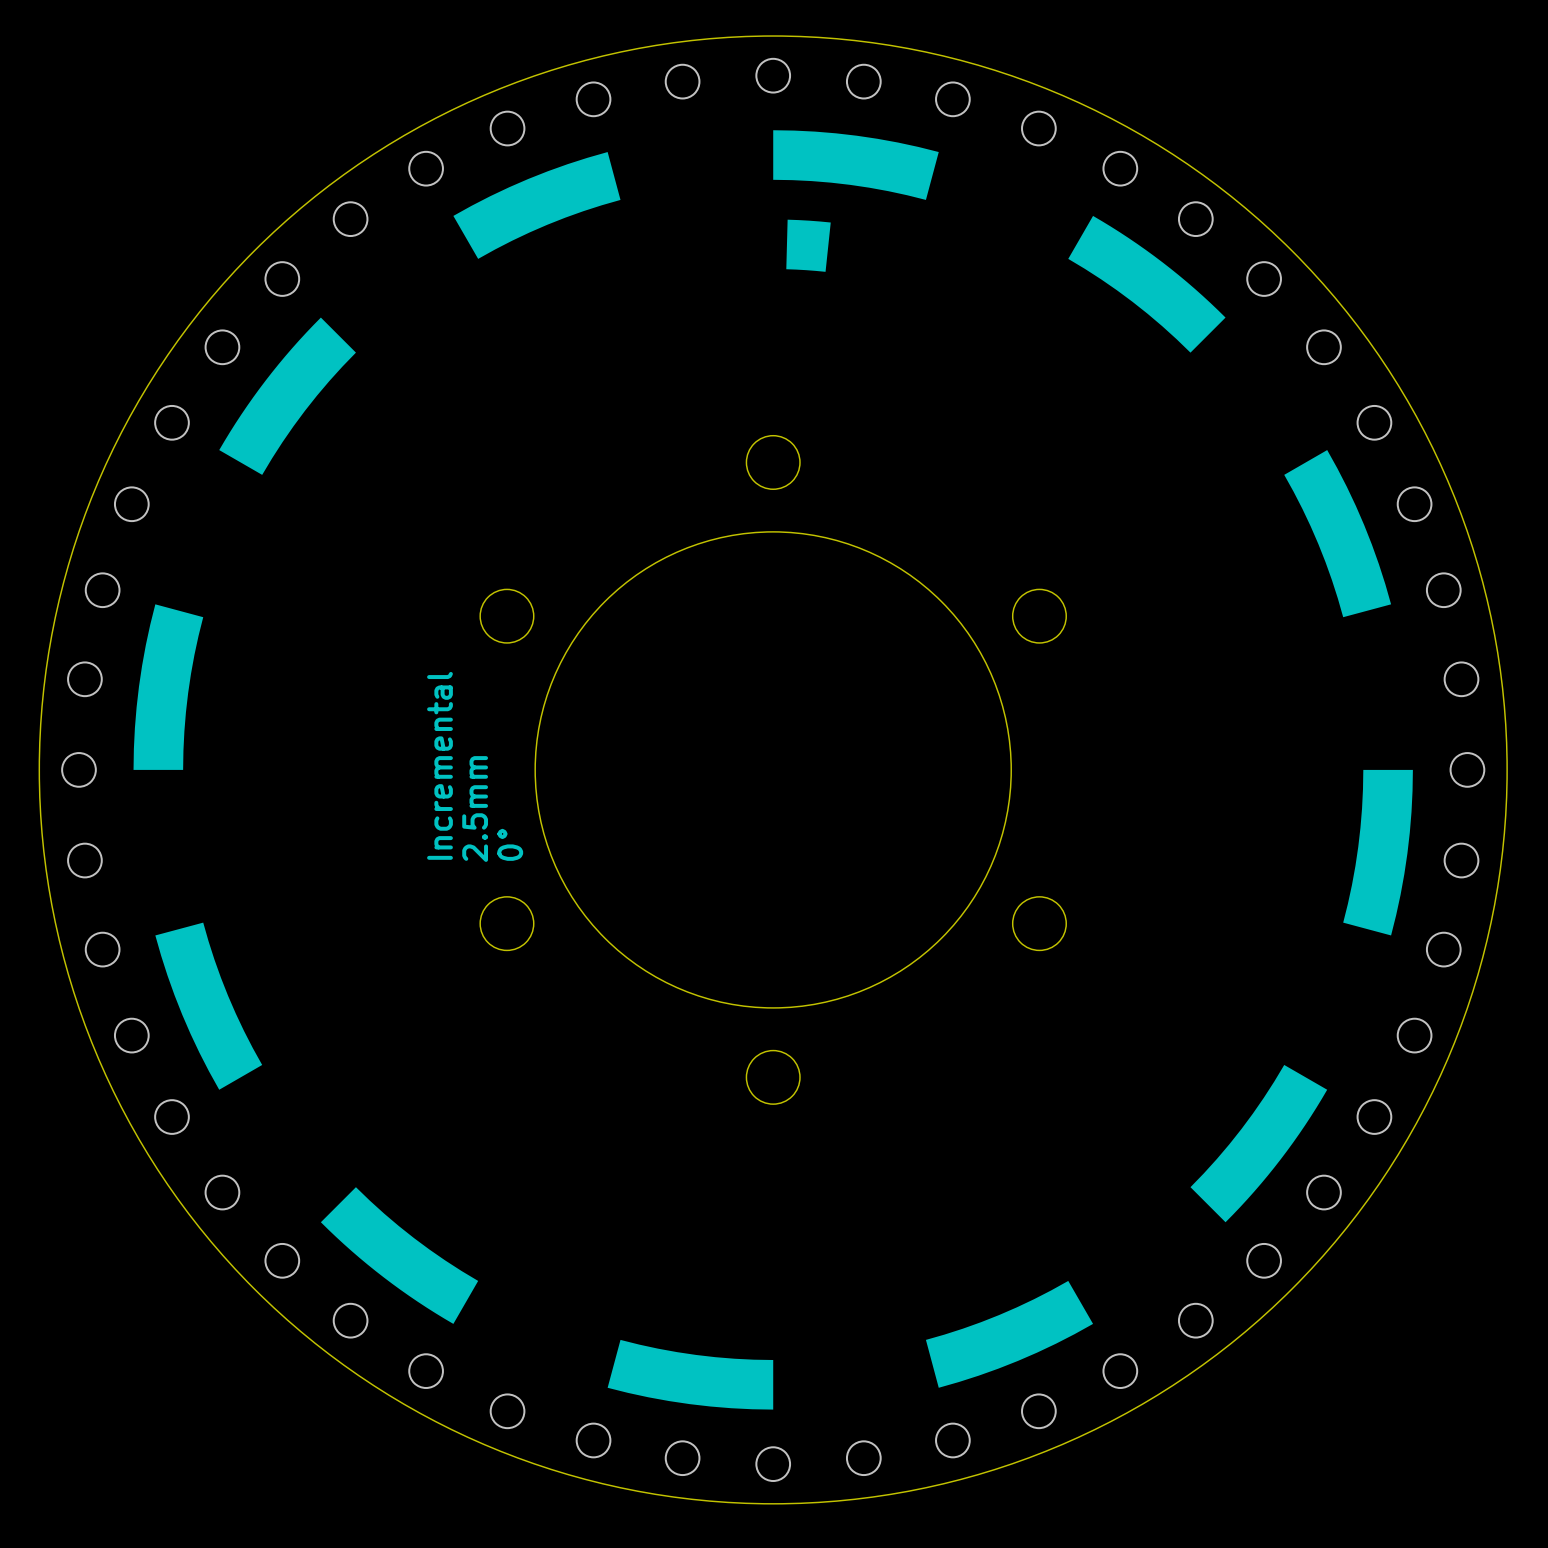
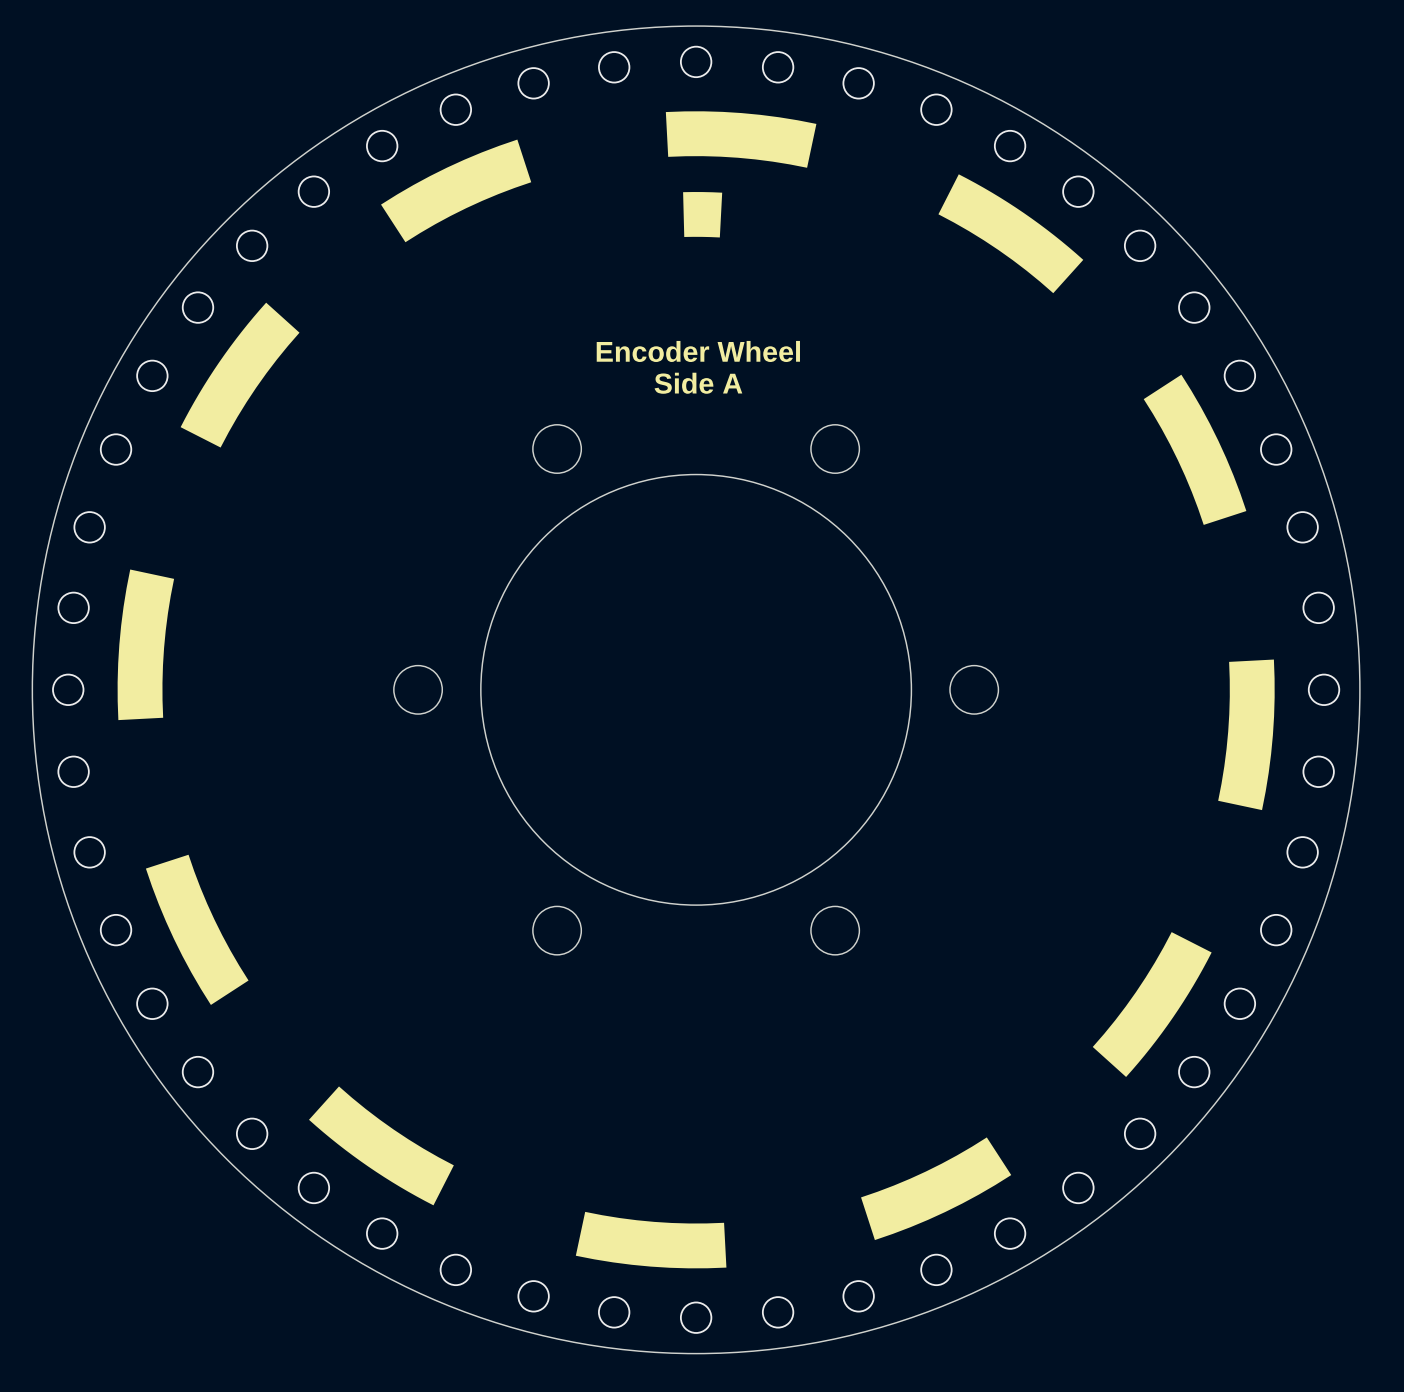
drawing shape: [133, 130, 1413, 1410] -> [117, 111, 1275, 1269]
text: none -> Encoder Wheel (698, 351)
text: none -> Side A (698, 383)
round board edge: [745, 435, 801, 490] -> none
round board edge: none -> [532, 424, 582, 474]
round board edge: none -> [810, 424, 860, 474]
round board edge: [479, 588, 535, 644] -> none
round board edge: [1012, 588, 1067, 644] -> none
round board edge: none -> [393, 665, 443, 715]
round board edge: none -> [949, 665, 999, 715]
text: Incremental (439, 765) -> none
text: 2.5mm (475, 809) -> none
text: 0° (510, 844) -> none
round board edge: [479, 896, 535, 951] -> none
round board edge: [1012, 896, 1067, 951] -> none
round board edge: none -> [532, 905, 582, 956]
round board edge: none -> [810, 905, 860, 956]
round board edge: [745, 1050, 801, 1105] -> none

